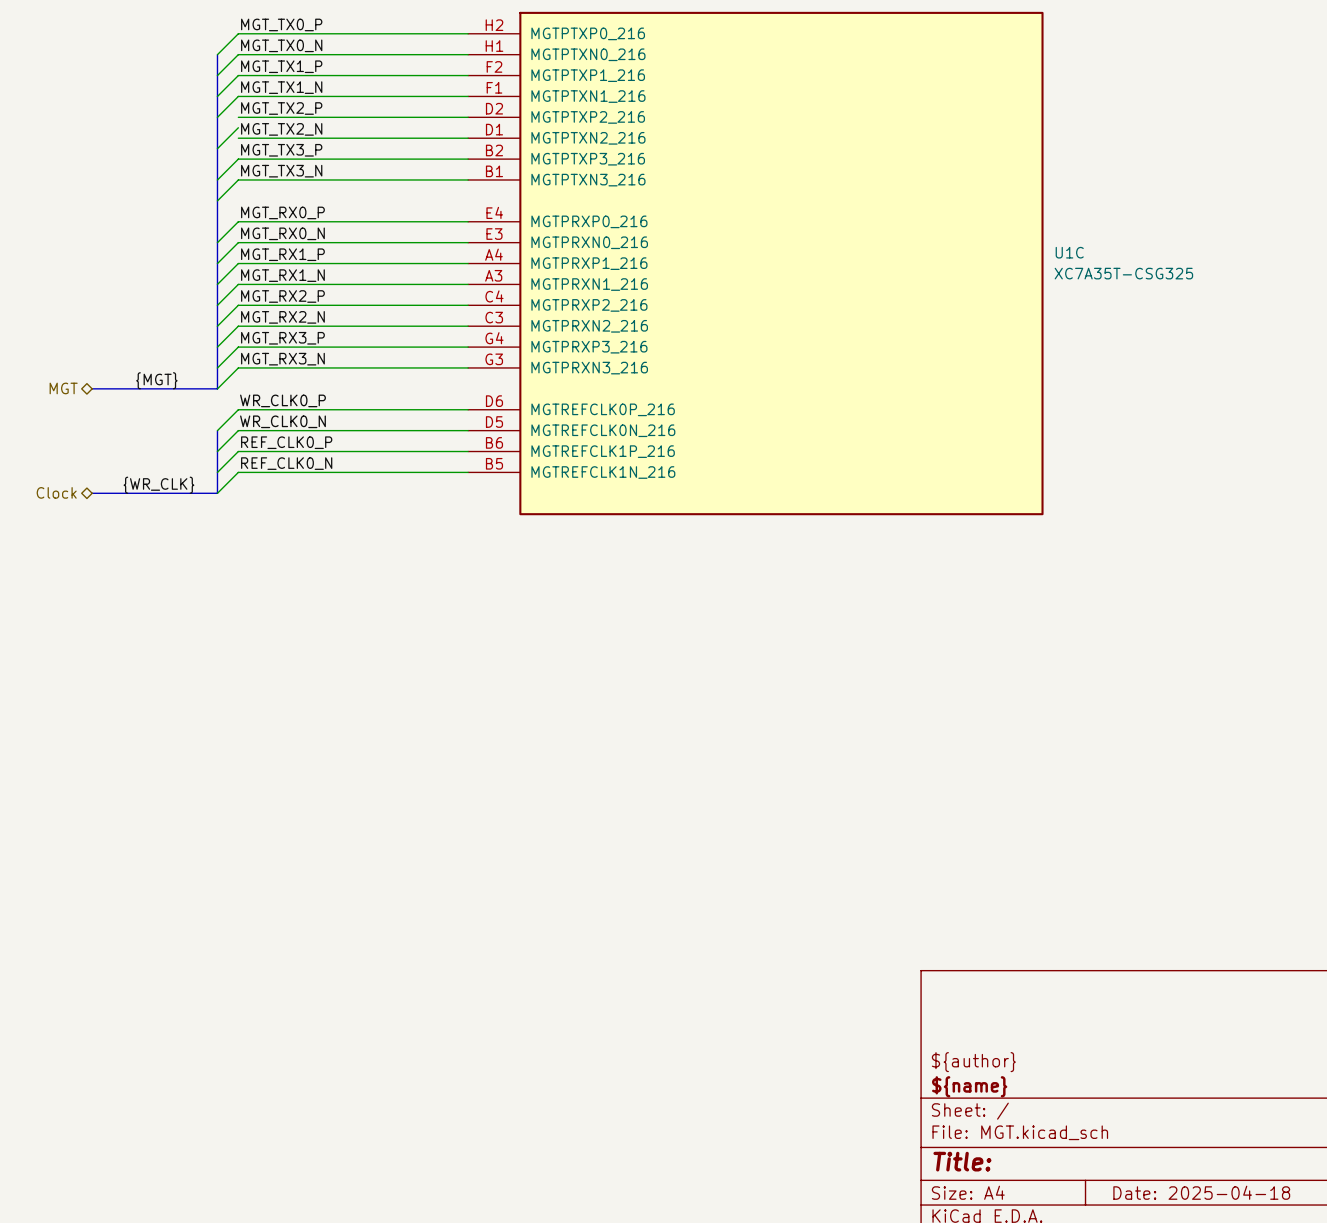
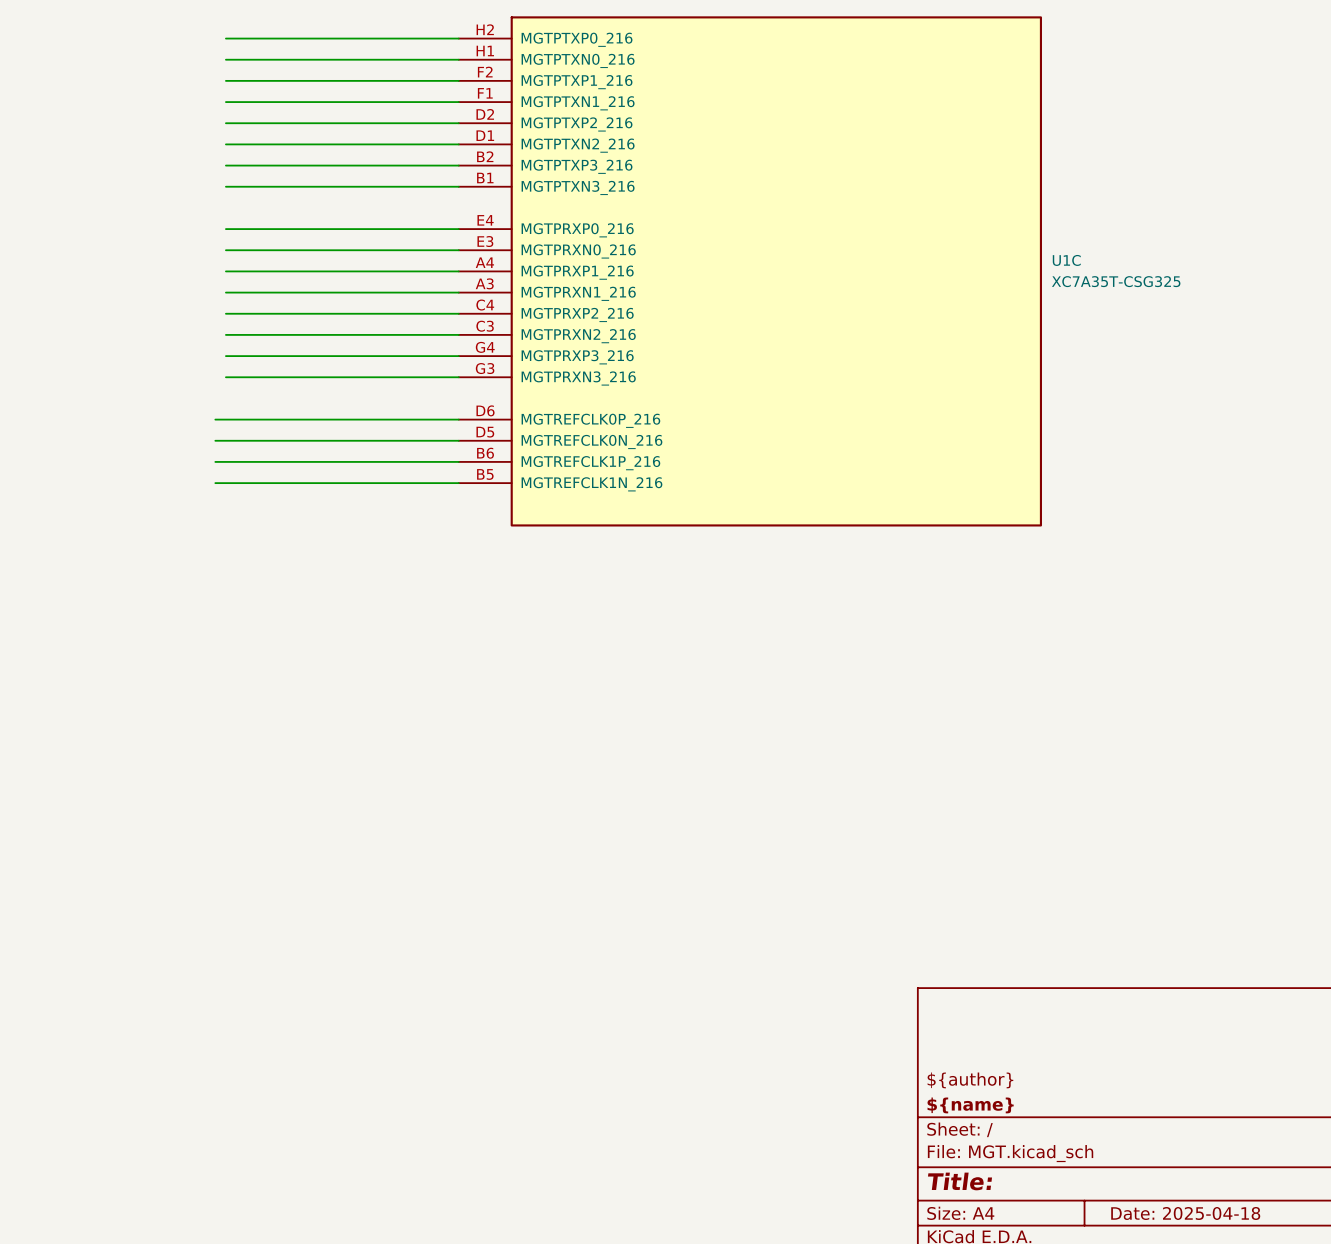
label: MGT_TX0_P (281, 24) -> none
wire: (238, 33) (217, 54) -> none
label: MGT_TX0_N (281, 45) -> none
bus: (217, 54) (217, 388) (92, 388) -> none
wire: (238, 54) (217, 75) -> none
label: MGT_TX1_P (281, 66) -> none
wire: (238, 75) (217, 96) -> none
label: MGT_TX1_N (281, 87) -> none
wire: (238, 96) (217, 117) -> none
label: MGT_TX2_P (281, 108) -> none
wire: (238, 127) (217, 148) -> none
label: MGT_TX2_N (281, 129) -> none
label: MGT_TX3_P (281, 150) -> none
wire: (238, 159) (217, 179) -> none
label: MGT_TX3_N (281, 171) -> none
wire: (238, 179) (217, 200) -> none
label: MGT_RX0_P (282, 212) -> none
wire: (238, 221) (217, 242) -> none
label: MGT_RX0_N (282, 233) -> none
wire: (238, 242) (217, 263) -> none
label: MGT_RX1_P (282, 254) -> none
wire: (238, 263) (217, 284) -> none
label: MGT_RX1_N (282, 275) -> none
wire: (238, 284) (217, 305) -> none
label: MGT_RX2_P (282, 296) -> none
wire: (238, 305) (217, 326) -> none
label: MGT_RX2_N (282, 317) -> none
wire: (238, 326) (217, 347) -> none
label: MGT_RX3_P (282, 338) -> none
wire: (238, 347) (217, 367) -> none
label: MGT_RX3_N (282, 359) -> none
wire: (238, 367) (217, 388) -> none
label: {MGT} (156, 380) -> none
hierarchical label: MGT (63, 388) -> none
label: WR_CLK0_P (282, 400) -> none
wire: (238, 409) (217, 430) -> (225, 419) (215, 419)
label: WR_CLK0_N (282, 421) -> none
bus: (217, 430) (217, 493) (92, 493) -> none
wire: (238, 430) (217, 451) -> (225, 440) (215, 440)
label: REF_CLK0_P (286, 442) -> none
wire: (238, 451) (217, 472) -> (225, 461) (215, 461)
label: REF_CLK0_N (286, 463) -> none
wire: (238, 472) (217, 493) -> (225, 483) (215, 483)
label: {WR_CLK} (158, 485) -> none
hierarchical label: Clock (56, 492) -> none

